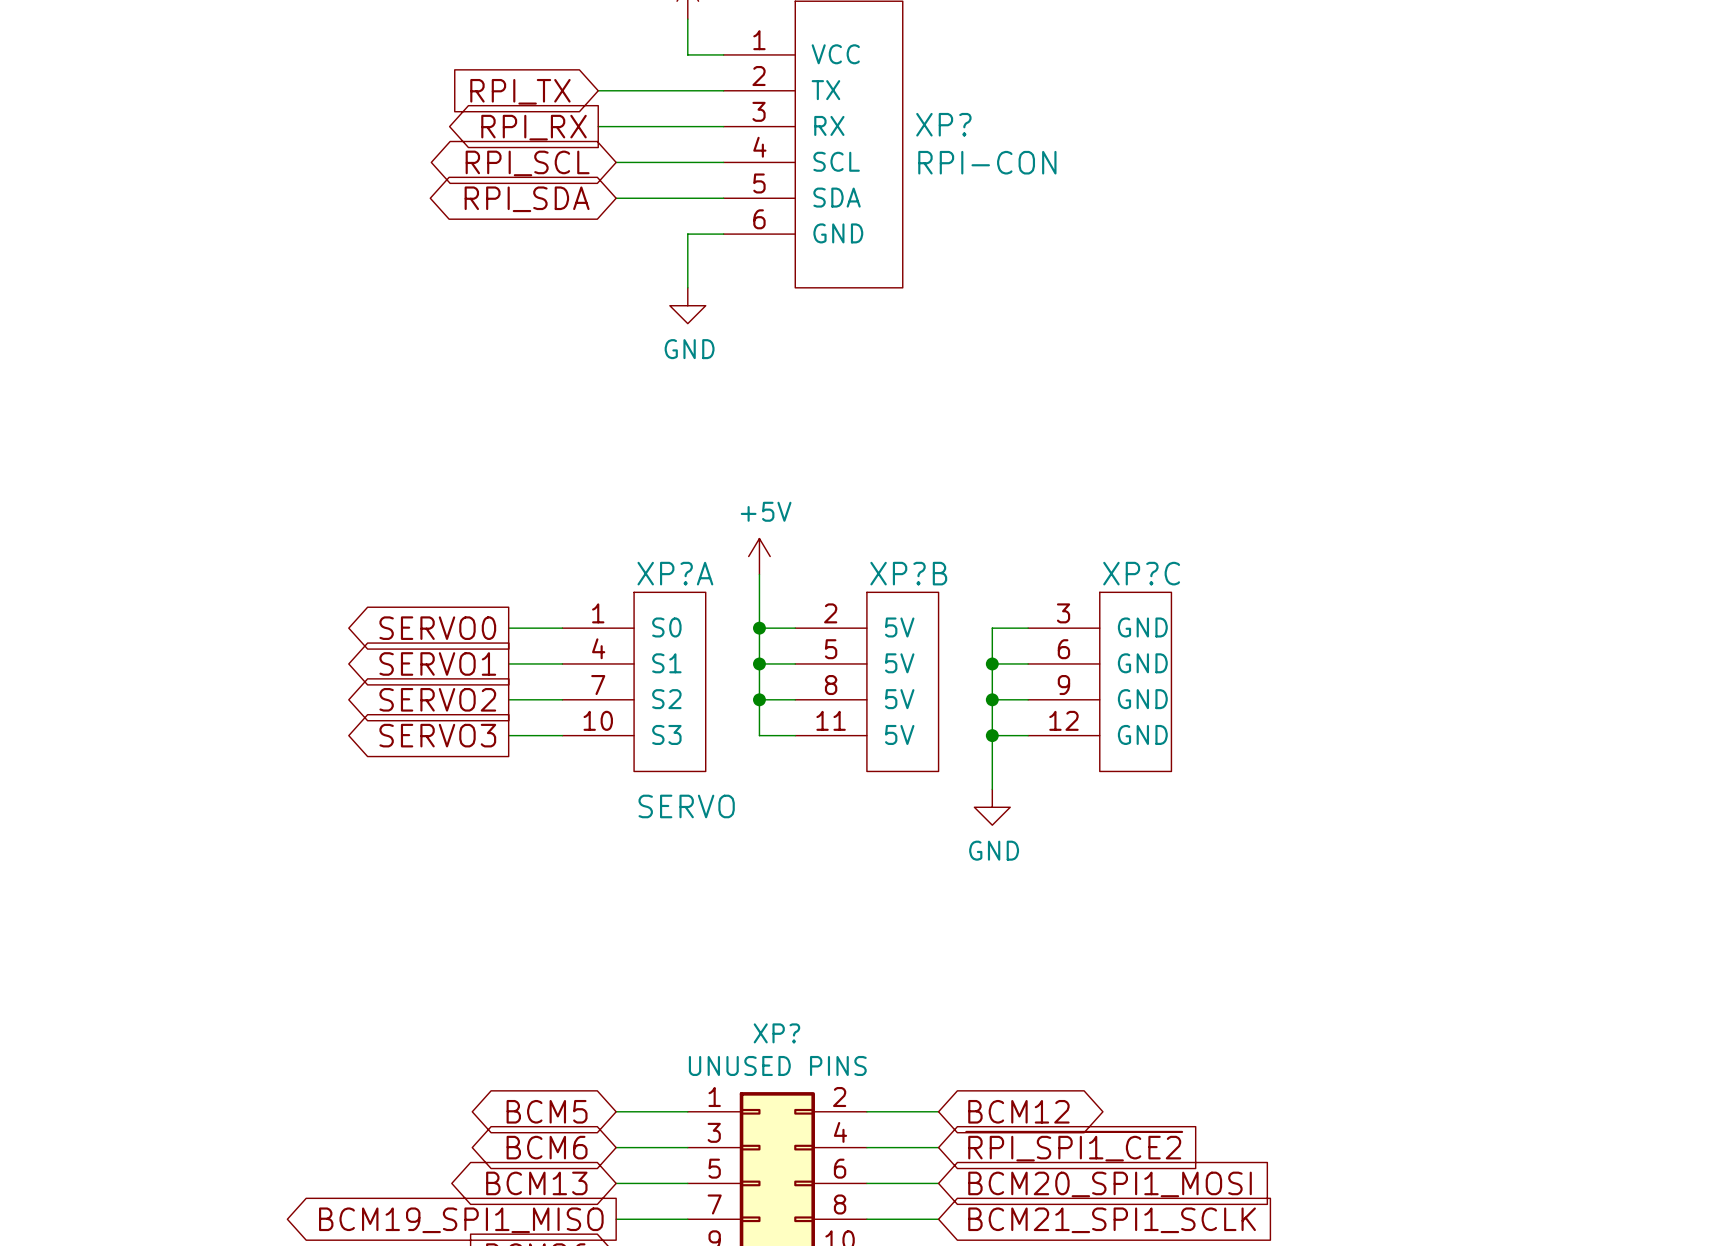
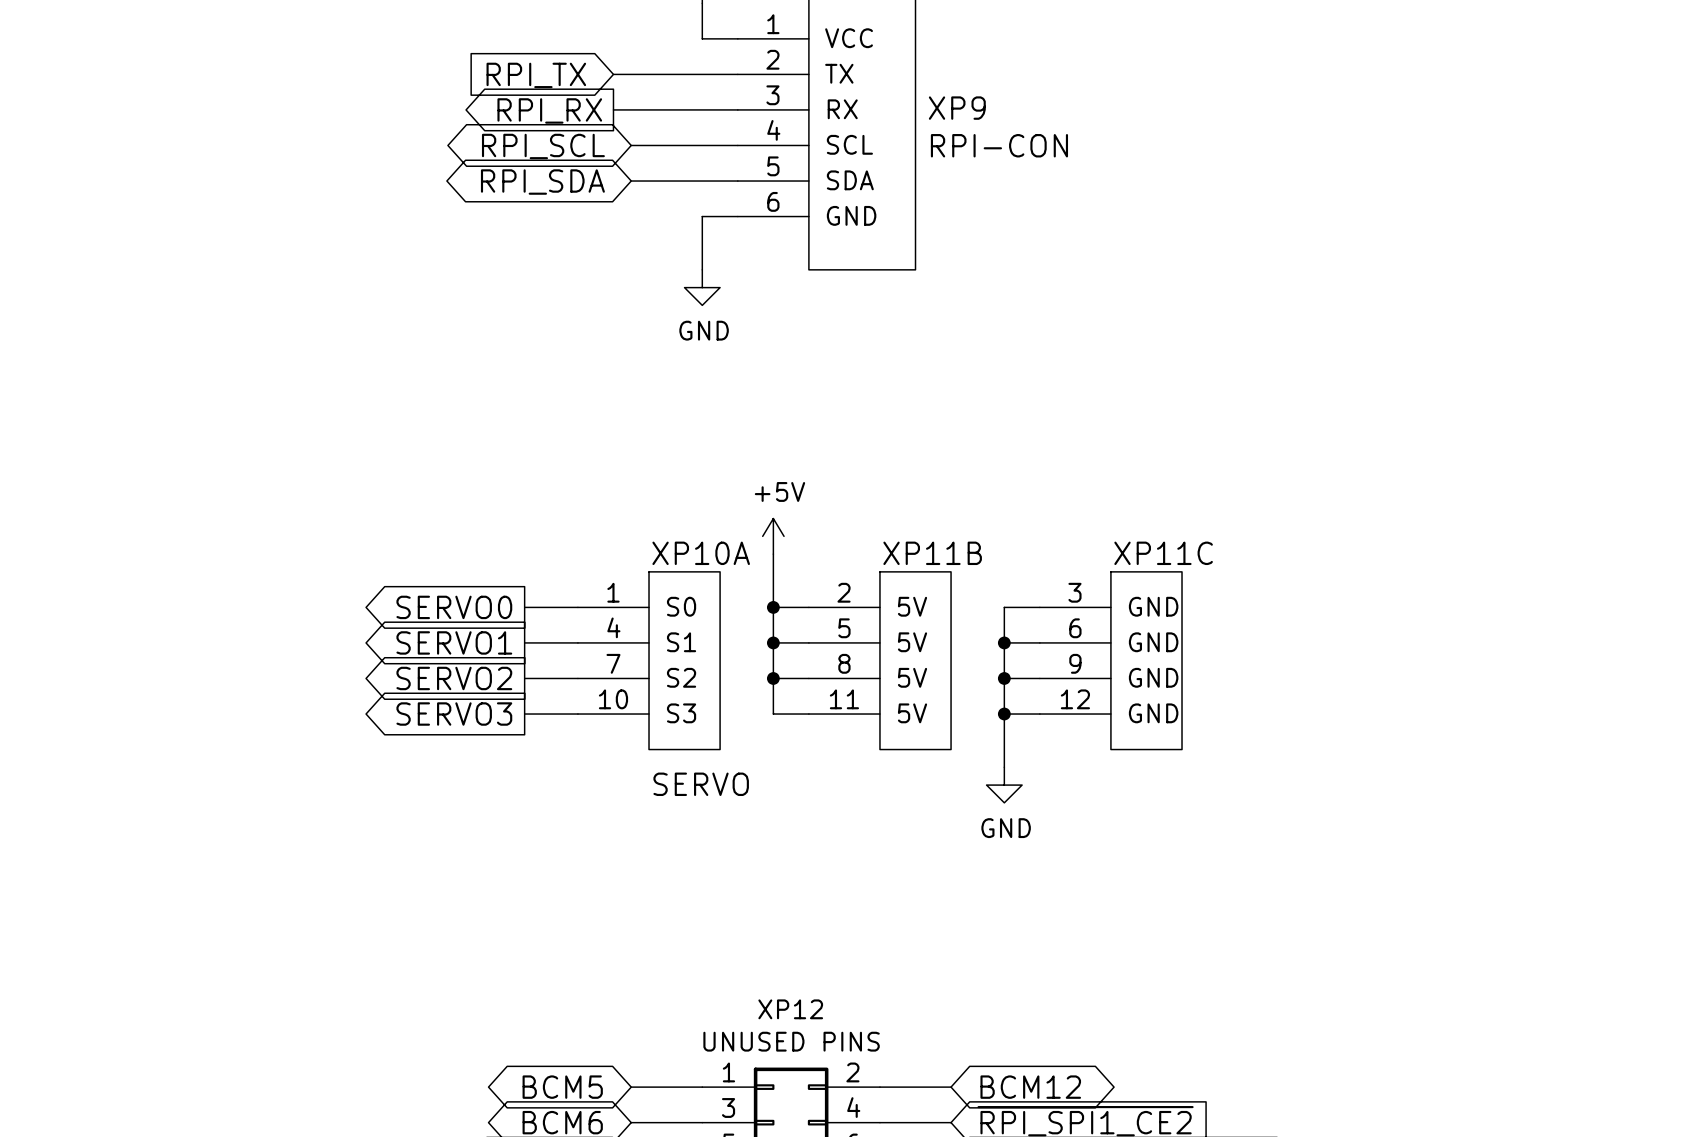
XP? name: XP? (943, 124) -> XP9 (957, 108)
XP?A name: XP?A (675, 573) -> XP10A (701, 553)
XP?B name: XP?B (908, 573) -> XP11B (932, 553)
XP?C name: XP?C (1141, 573) -> XP11C (1163, 553)
XP? name: XP? (776, 1033) -> XP12 (790, 1009)

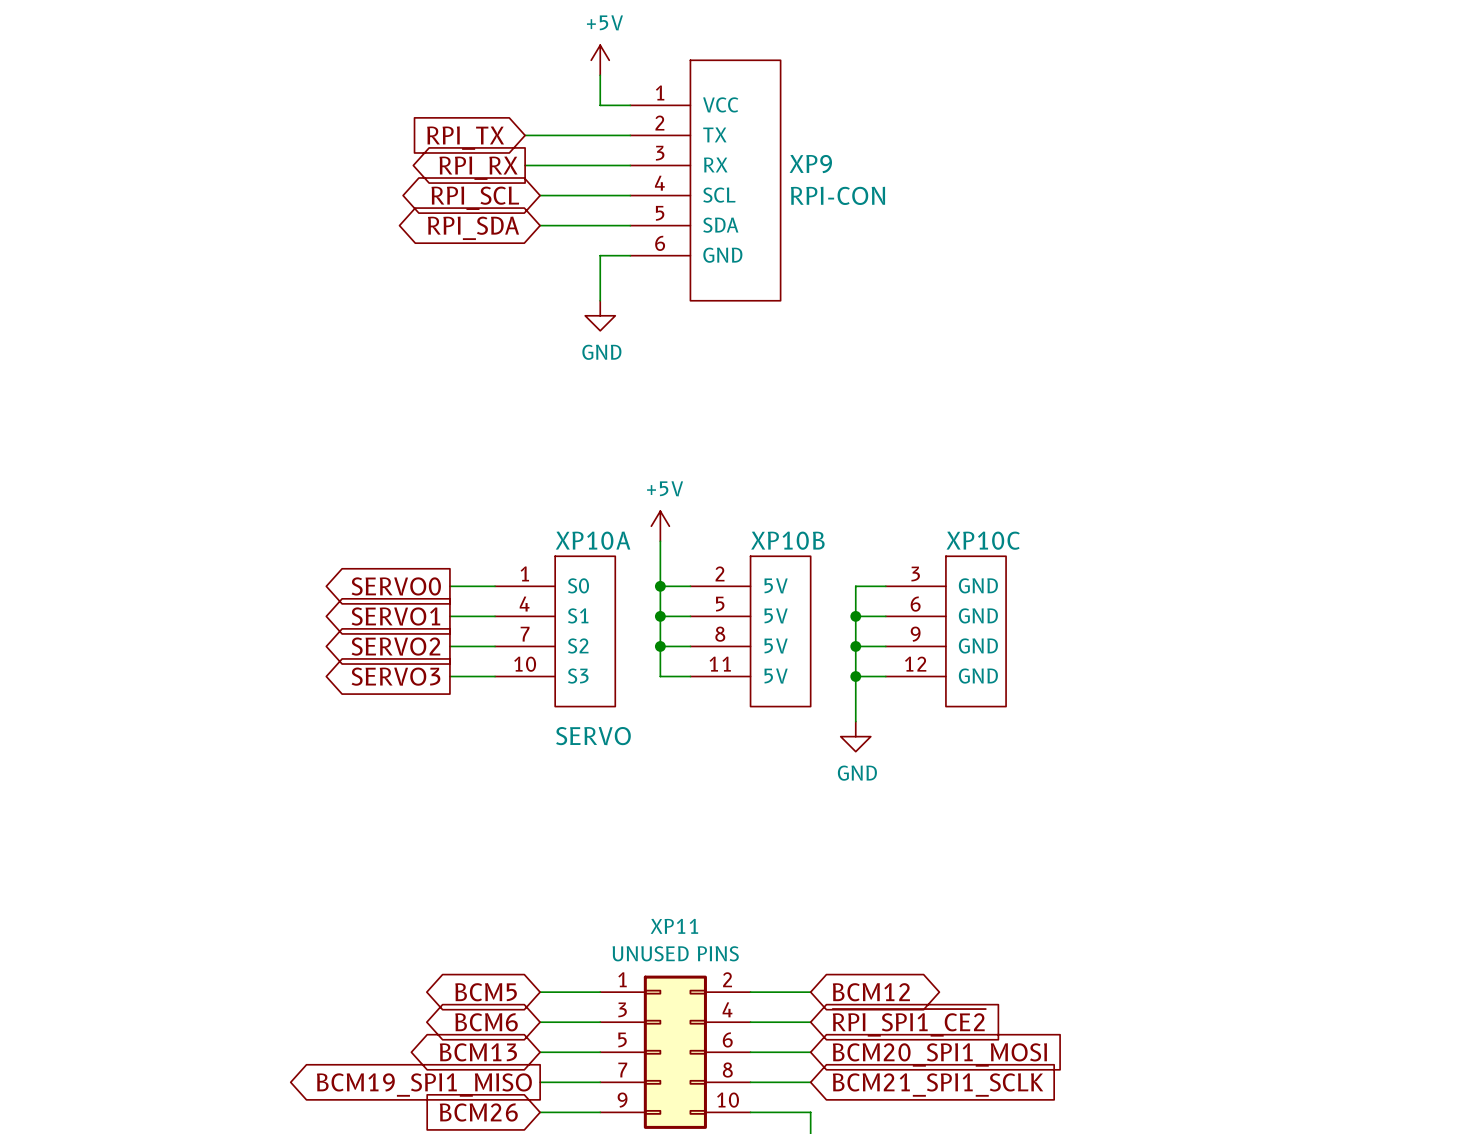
XP11B name: XP11B (932, 553) -> XP10B (787, 540)
XP11C name: XP11C (1163, 553) -> XP10C (983, 540)
XP12 name: XP12 (790, 1009) -> XP11 (674, 926)

